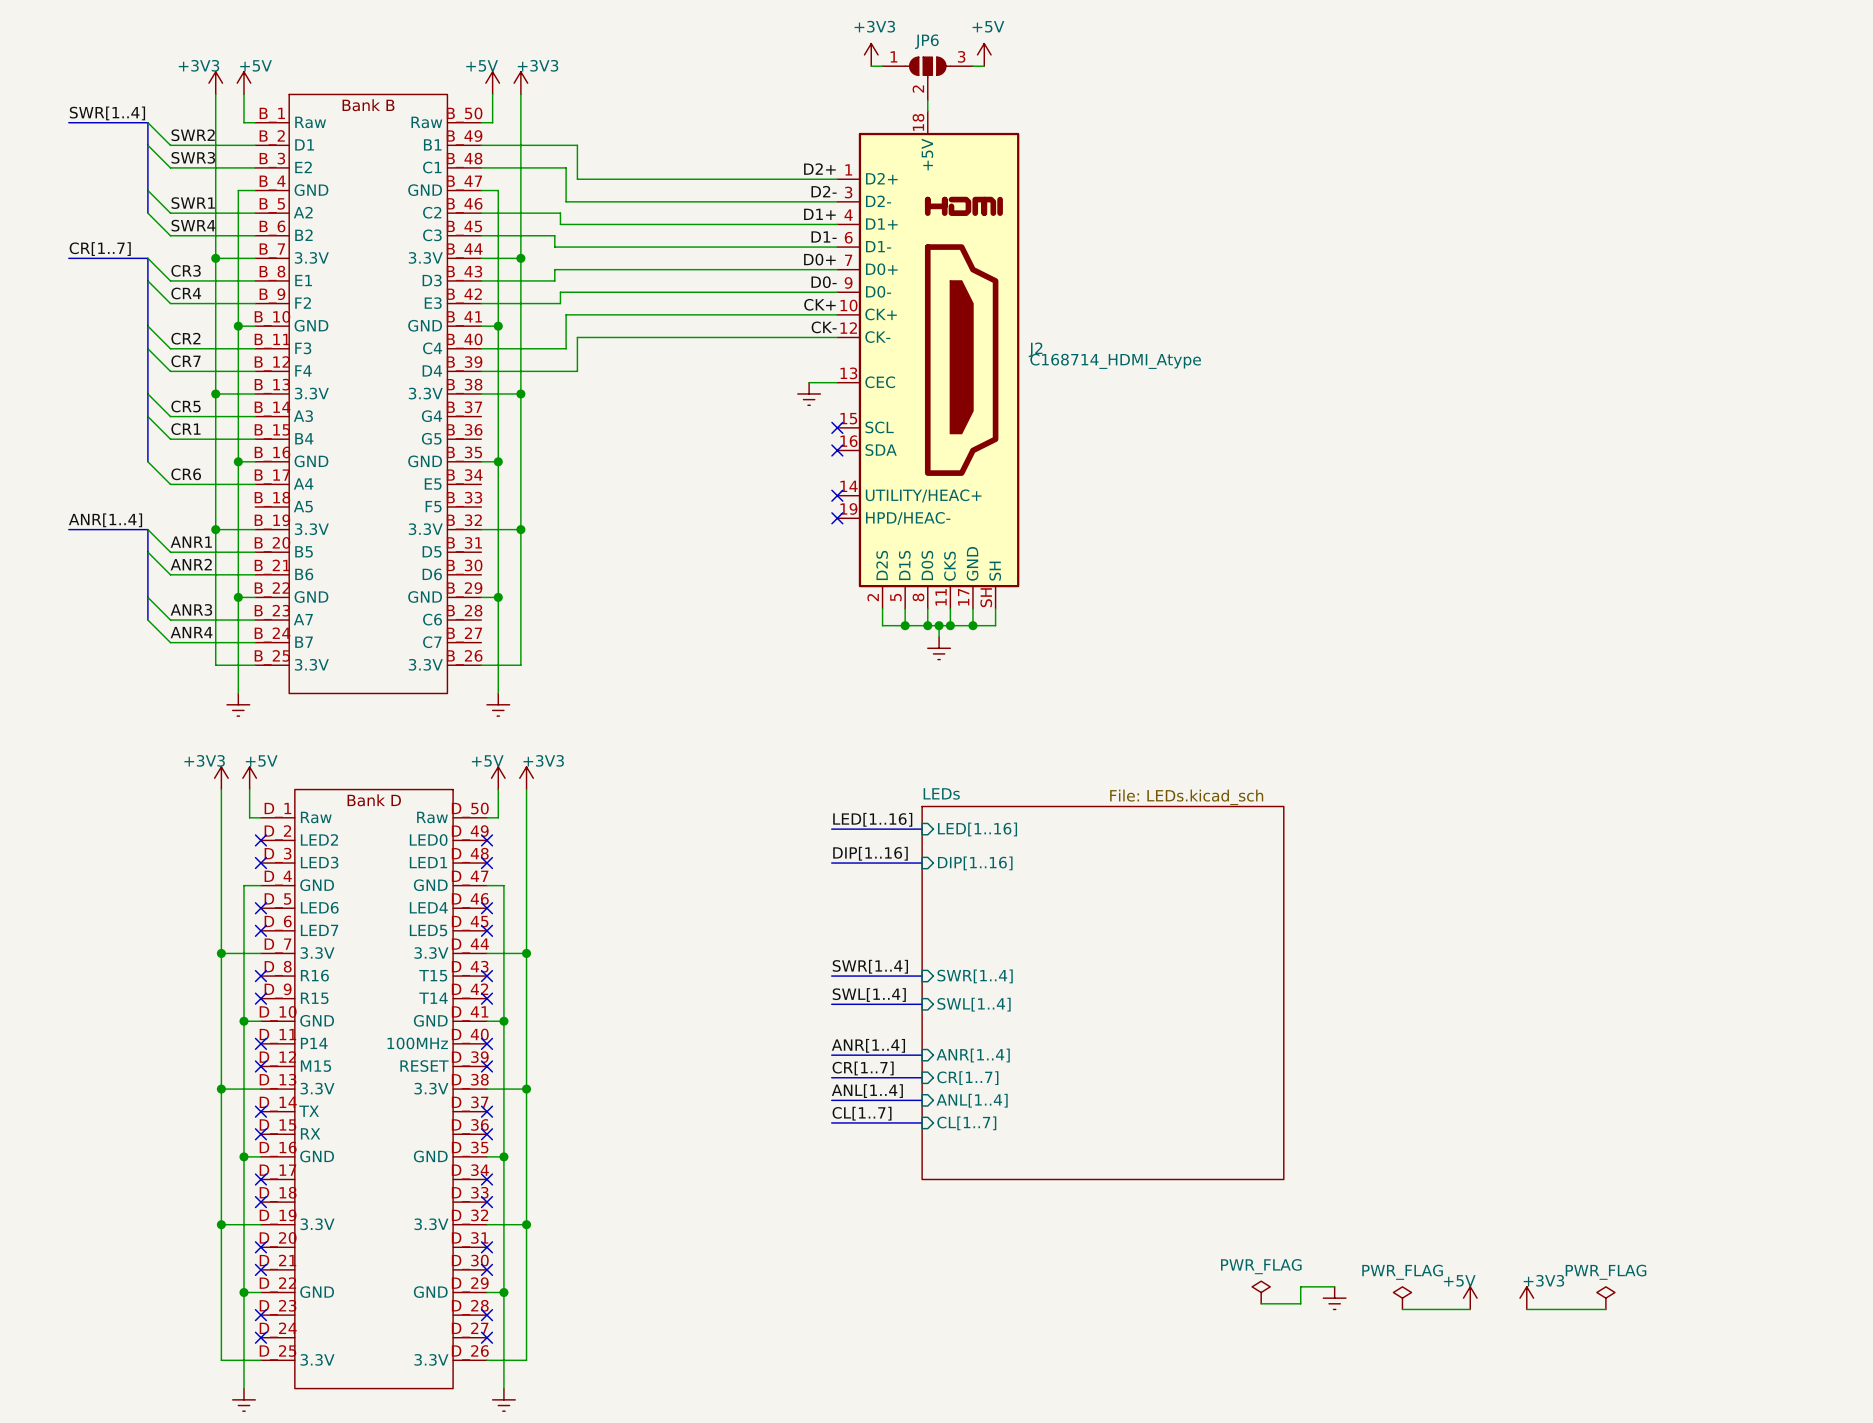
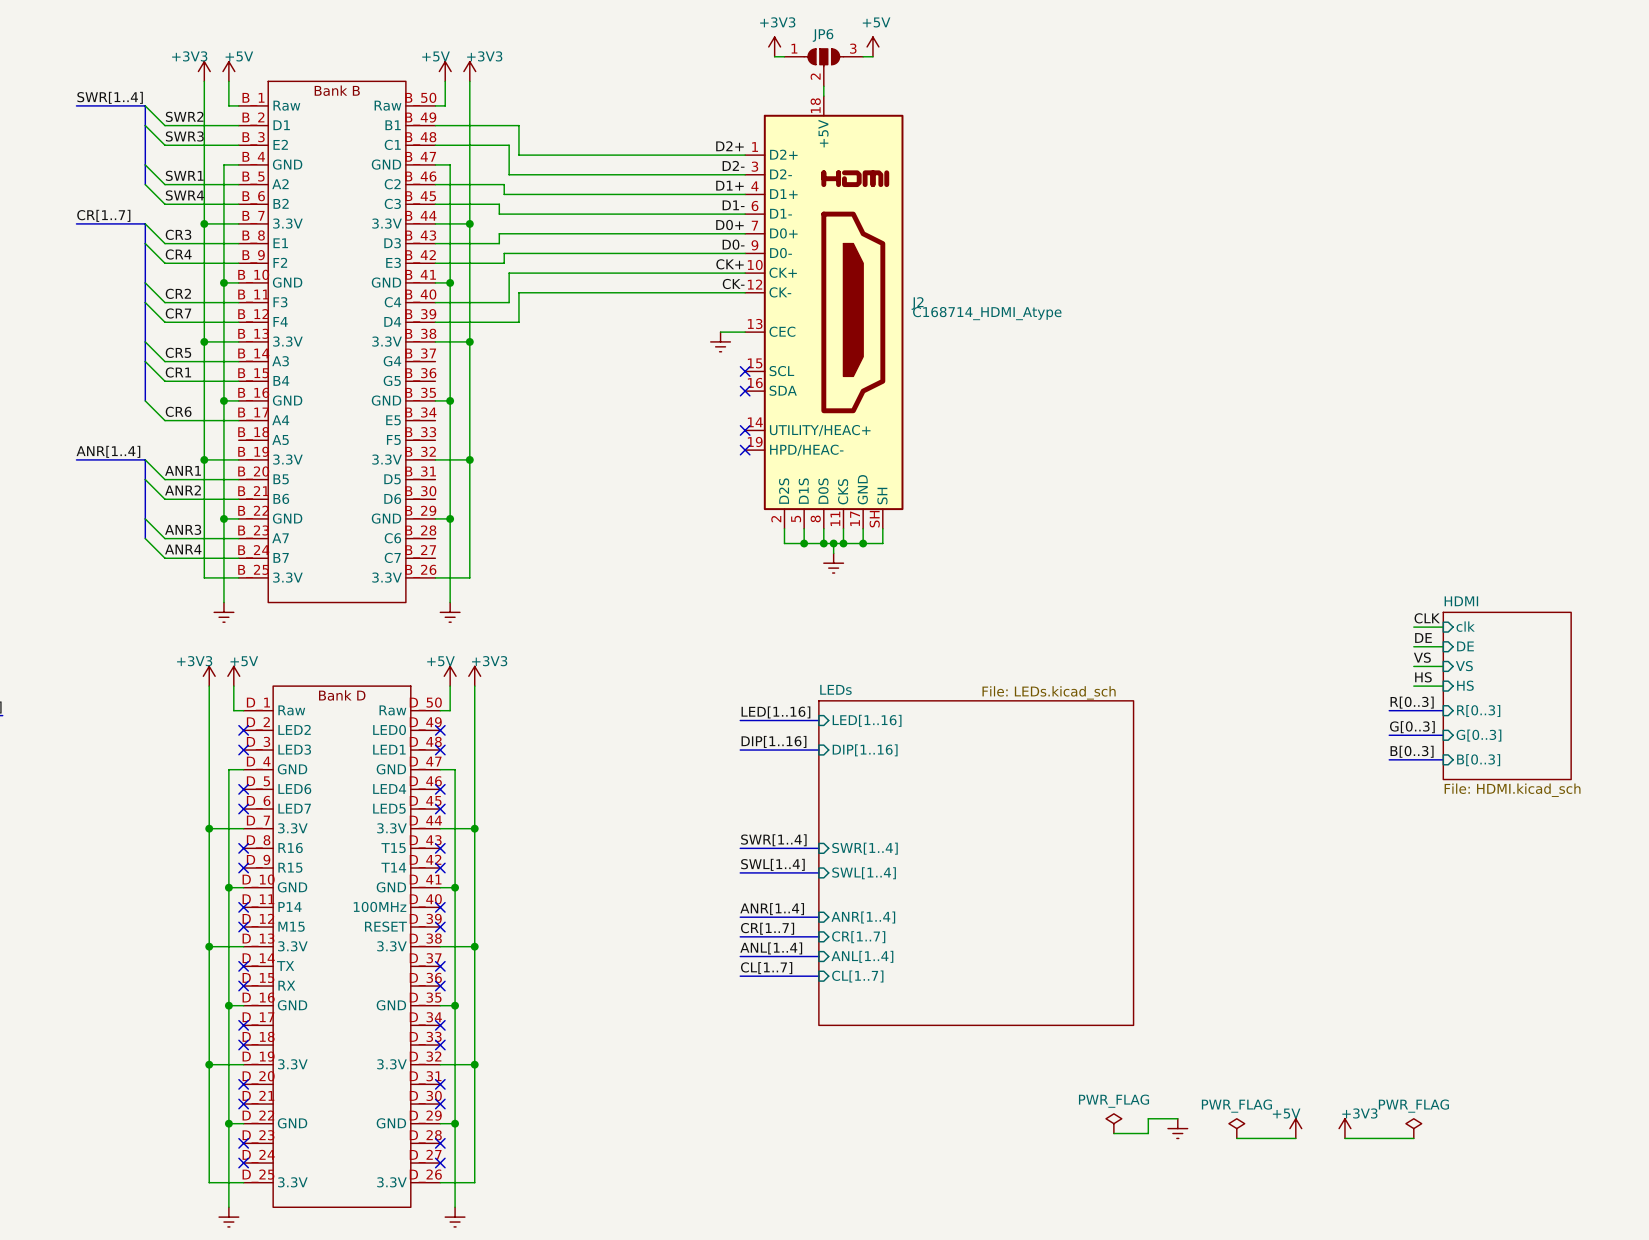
label: none -> CLK (1427, 618)
wire: none -> (1413, 627) (1443, 627)
sheet pin: none -> clk (1465, 626)
label: none -> DE (1423, 637)
sheet pin: none -> DE (1465, 646)
wire: none -> (1413, 646) (1443, 646)
label: none -> VS (1422, 657)
wire: none -> (1413, 666) (1443, 666)
sheet pin: none -> VS (1464, 666)
label: none -> HS (1423, 677)
wire: none -> (1413, 686) (1443, 686)
sheet pin: none -> HS (1465, 685)
sheet HDMI: none -> File: HDMI.kicad_sch (1507, 695)
label: none -> R[0..3] (1412, 702)
bus: none -> (1389, 710) (1443, 710)
sheet pin: none -> R[0..3] (1478, 711)
label: none -> G[0..3] (1412, 727)
bus: none -> (1389, 735) (1443, 735)
sheet pin: none -> G[0..3] (1478, 735)
label: none -> B[0..3] (1412, 751)
bus: none -> (1389, 759) (1443, 759)
sheet pin: none -> B[0..3] (1478, 760)

